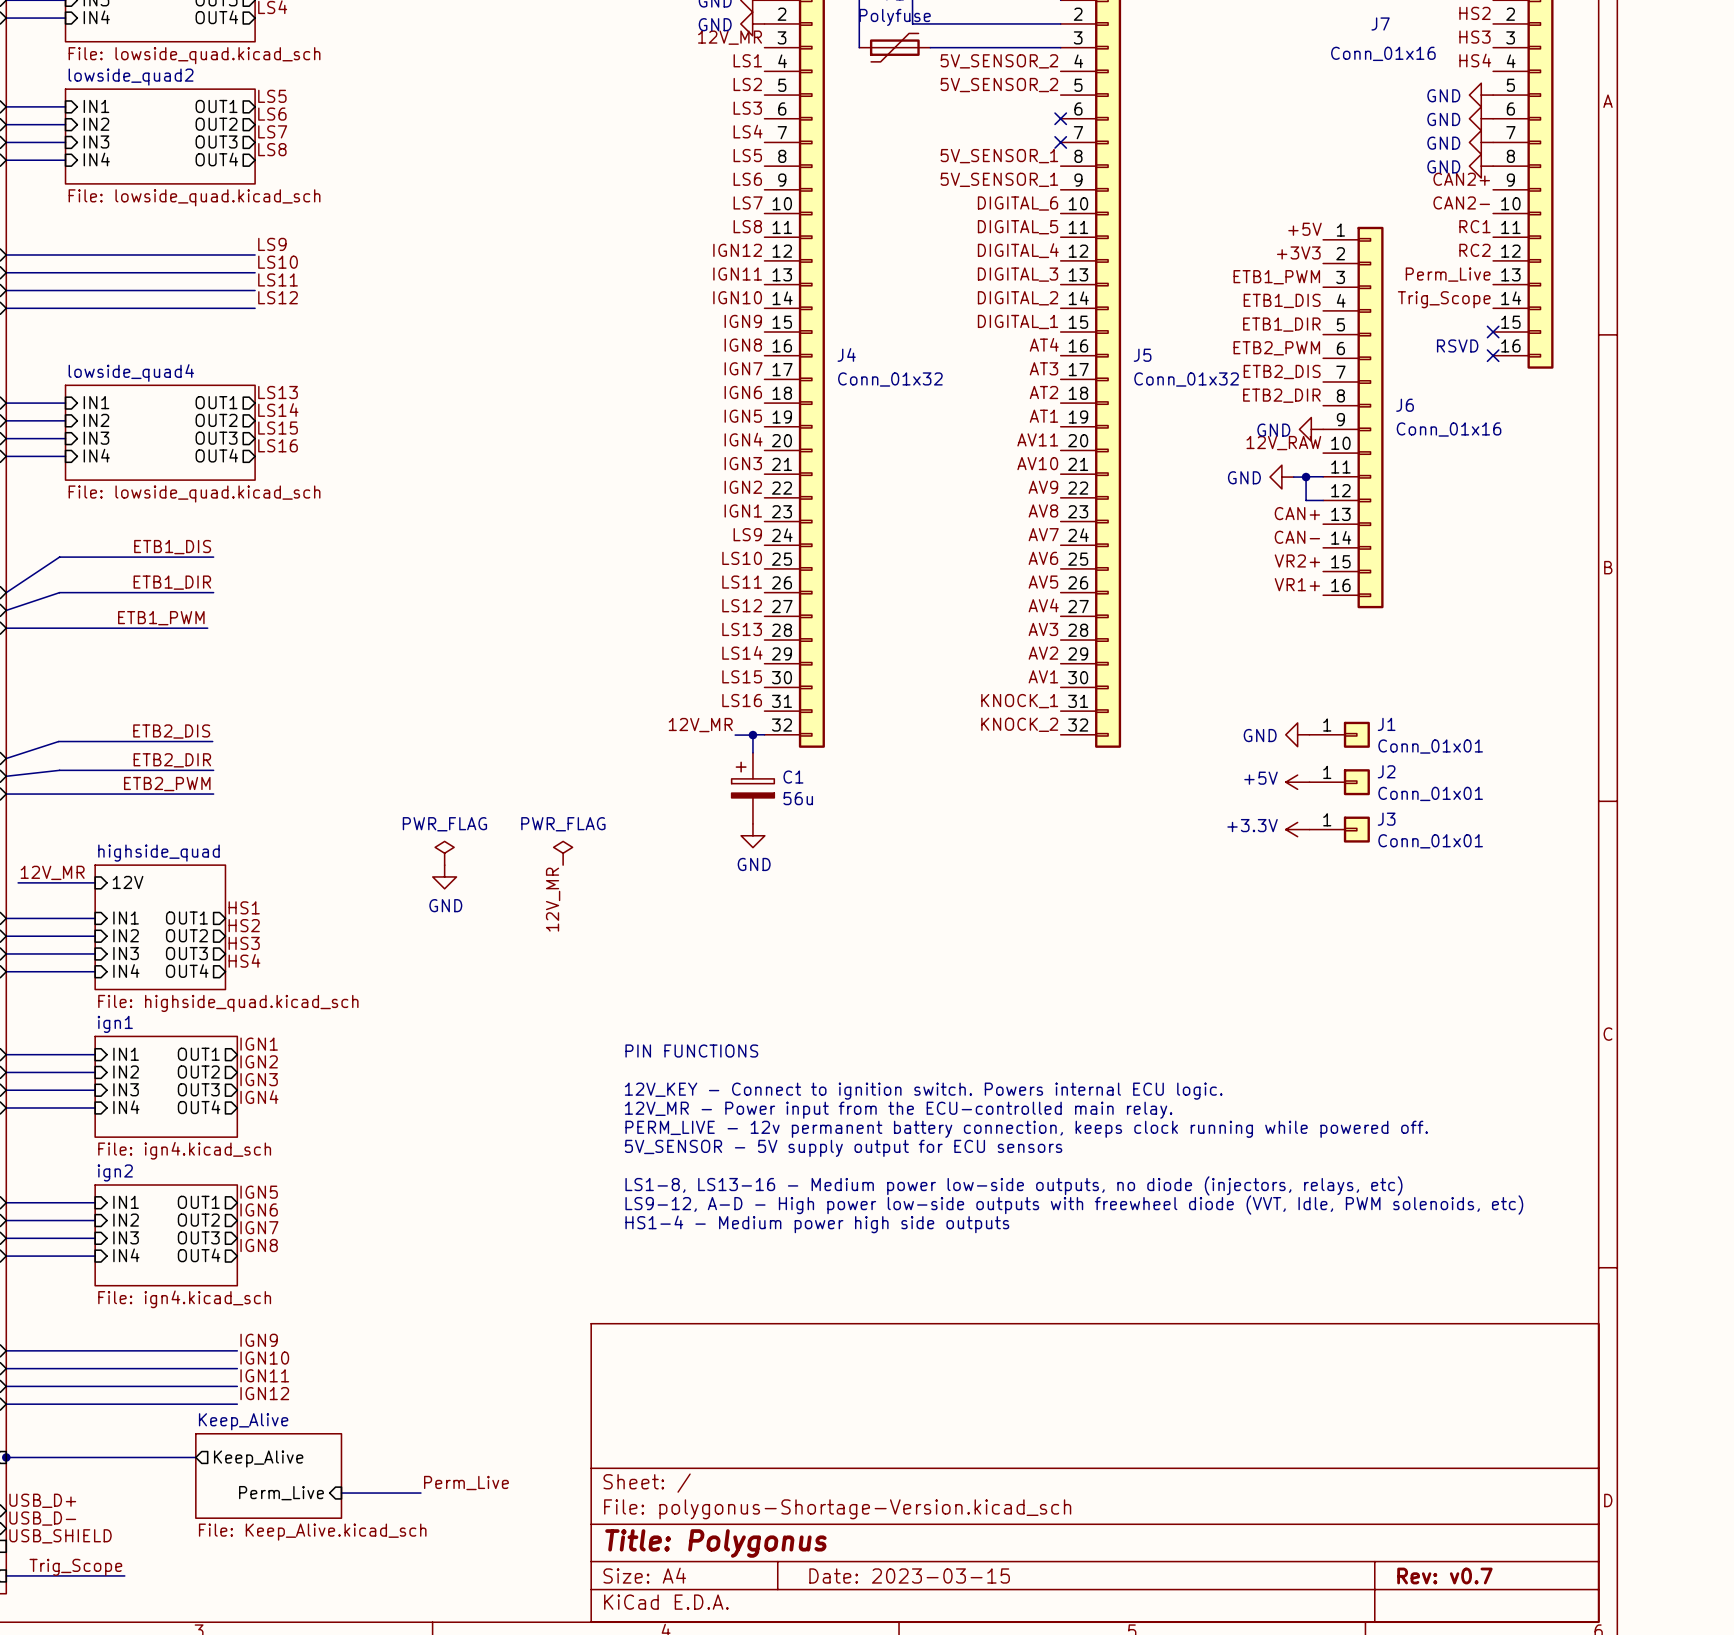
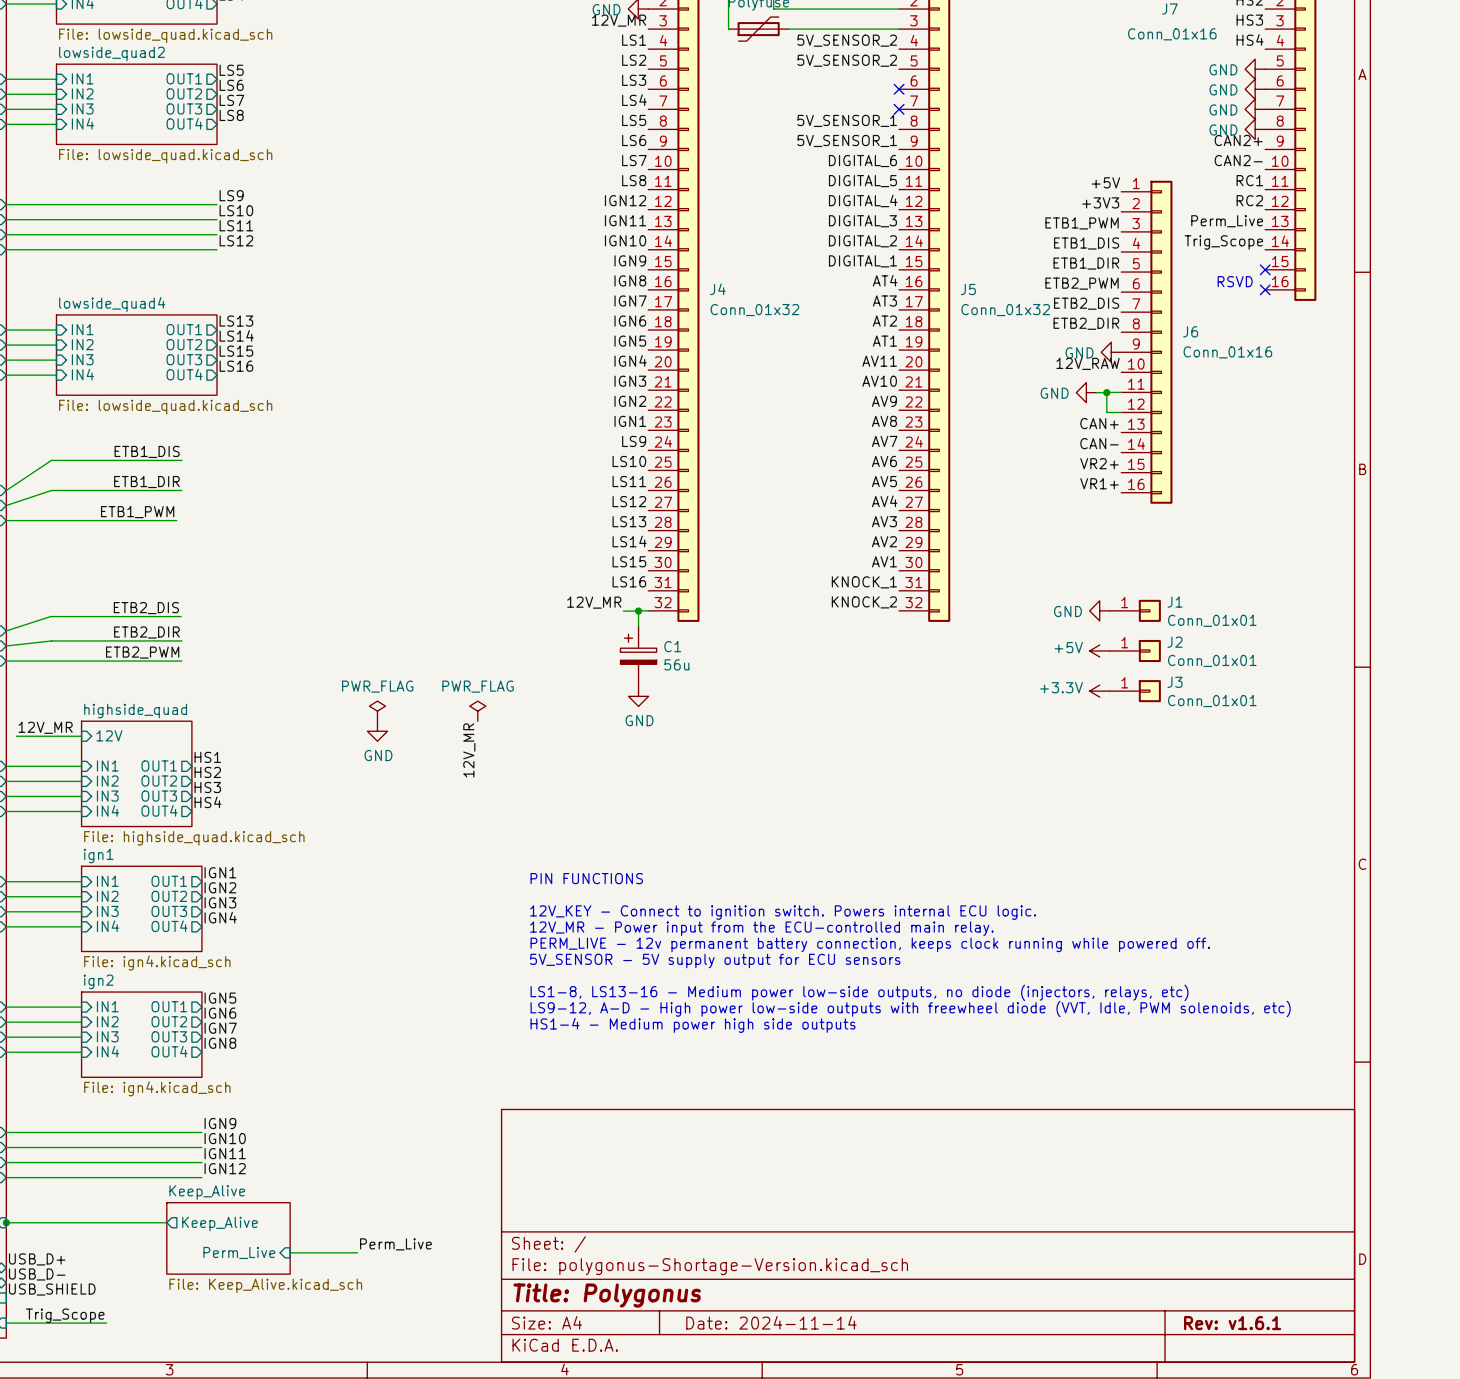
title block: Date: 2023-03-15 (909, 1575) -> Date: 2024-11-14 (771, 1322)
title block: Rev: v0.7 (1444, 1575) -> Rev: v1.6.1 (1232, 1323)

